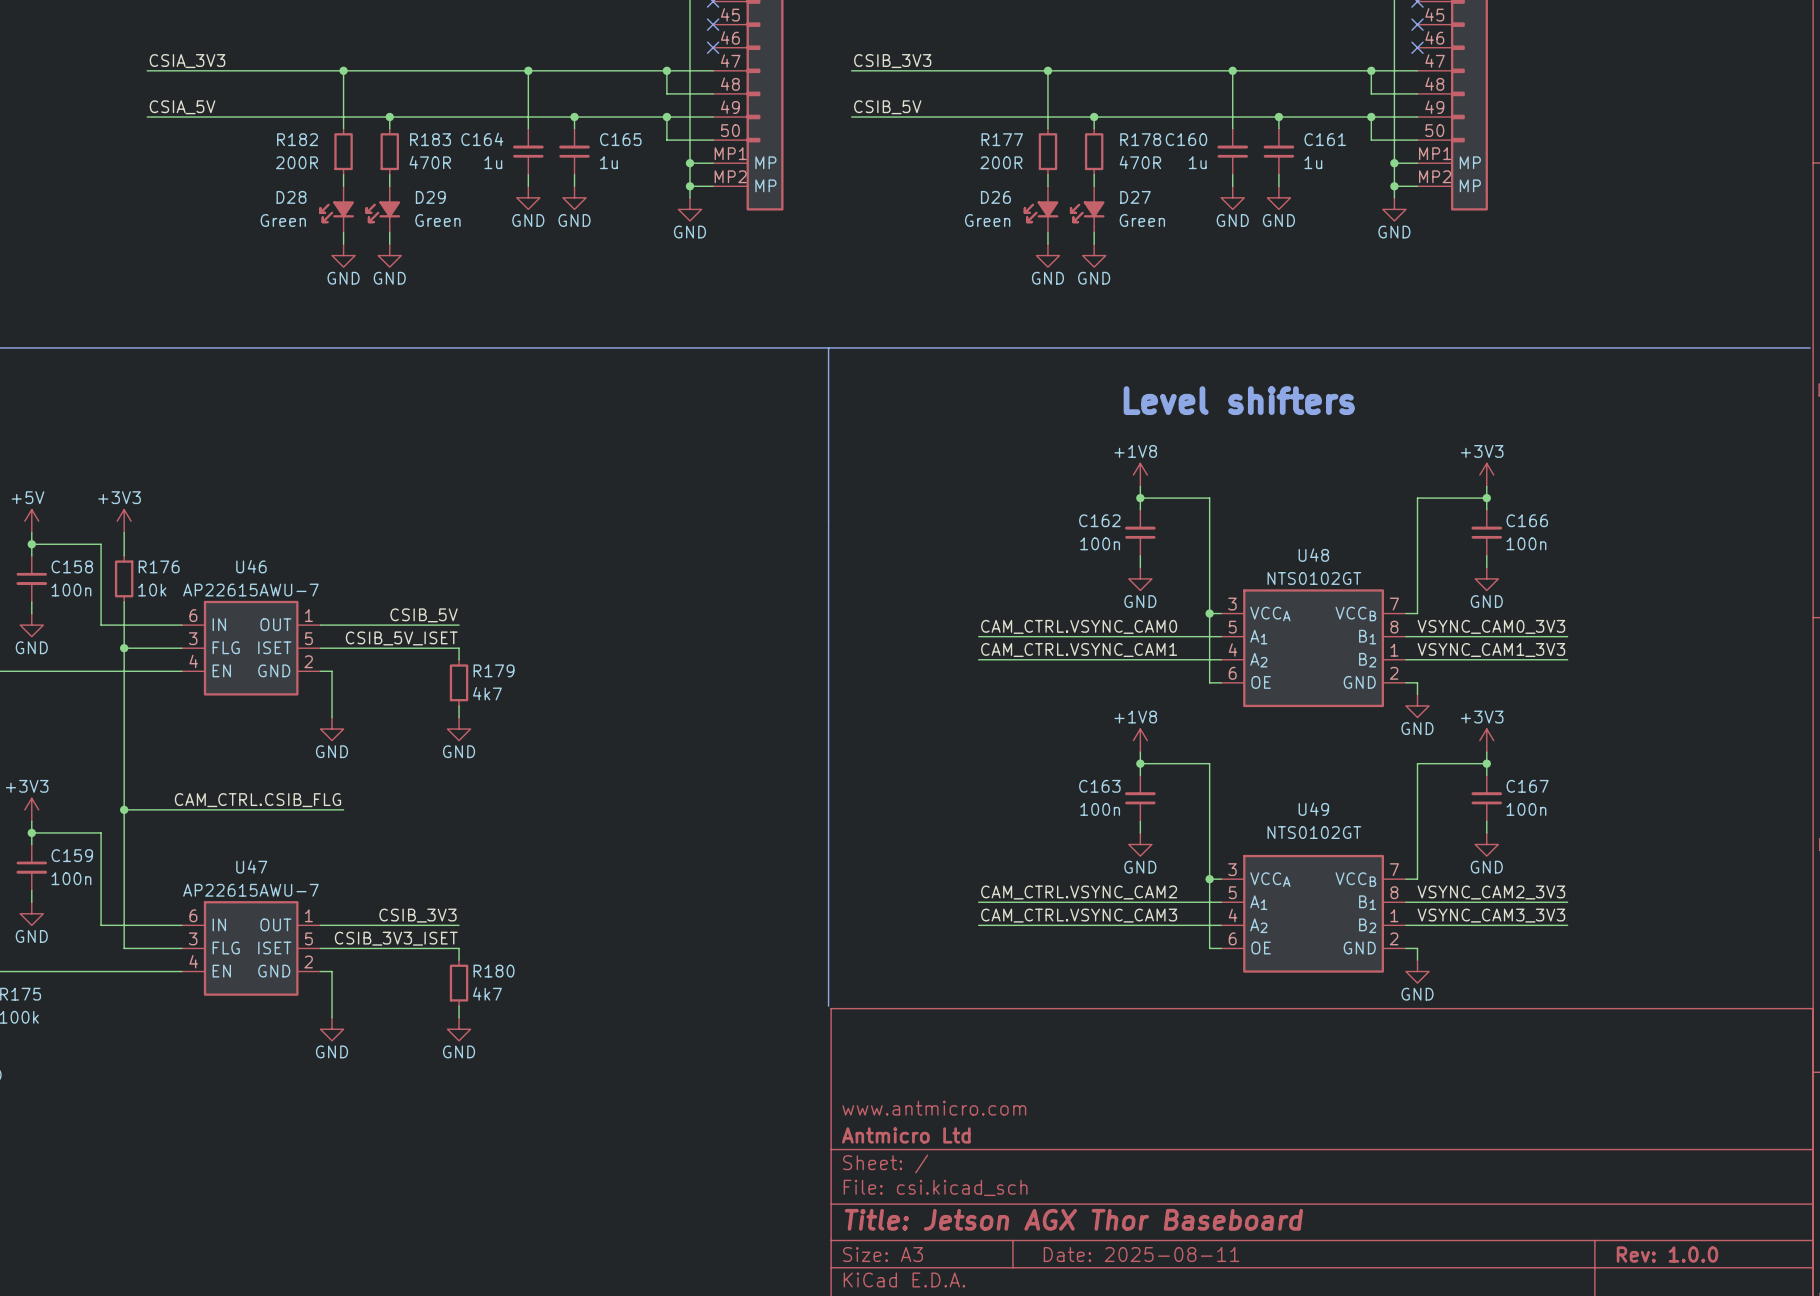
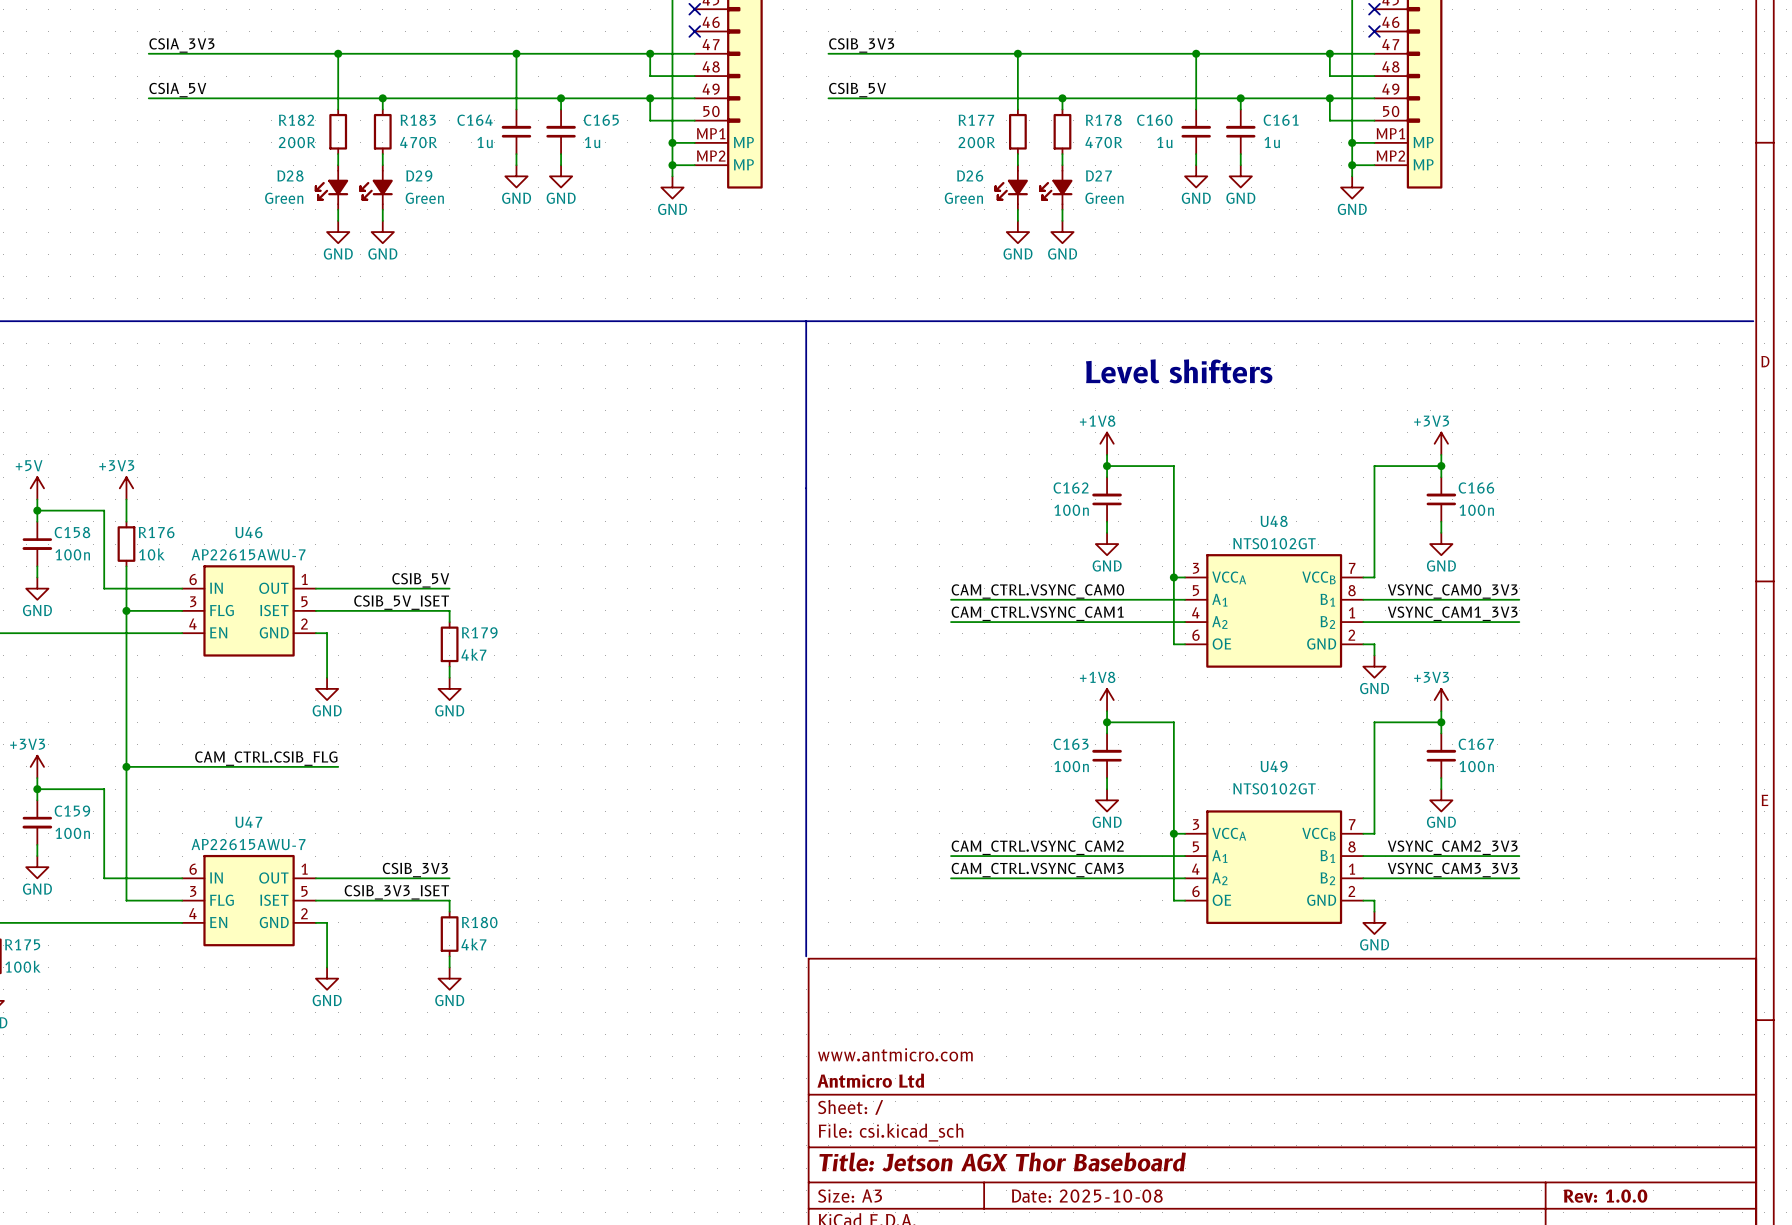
title block: Date: 2025-08-11 (1141, 1254) -> Date: 2025-10-08 (1087, 1196)

